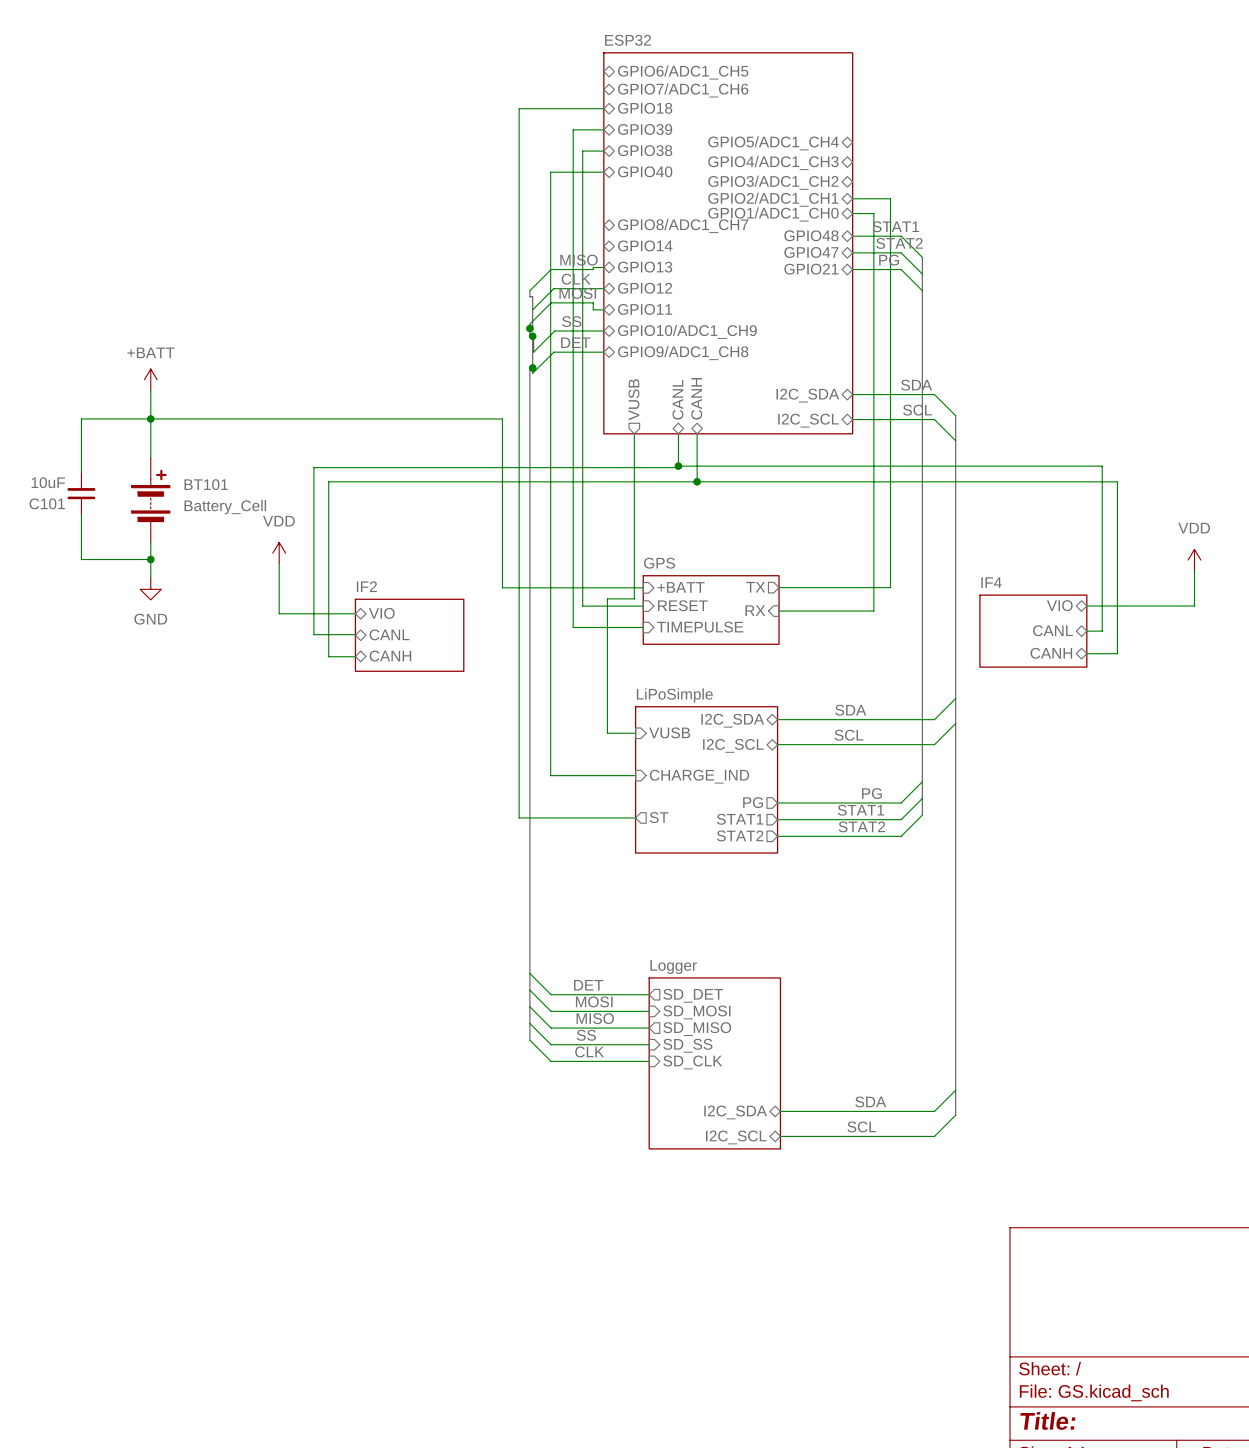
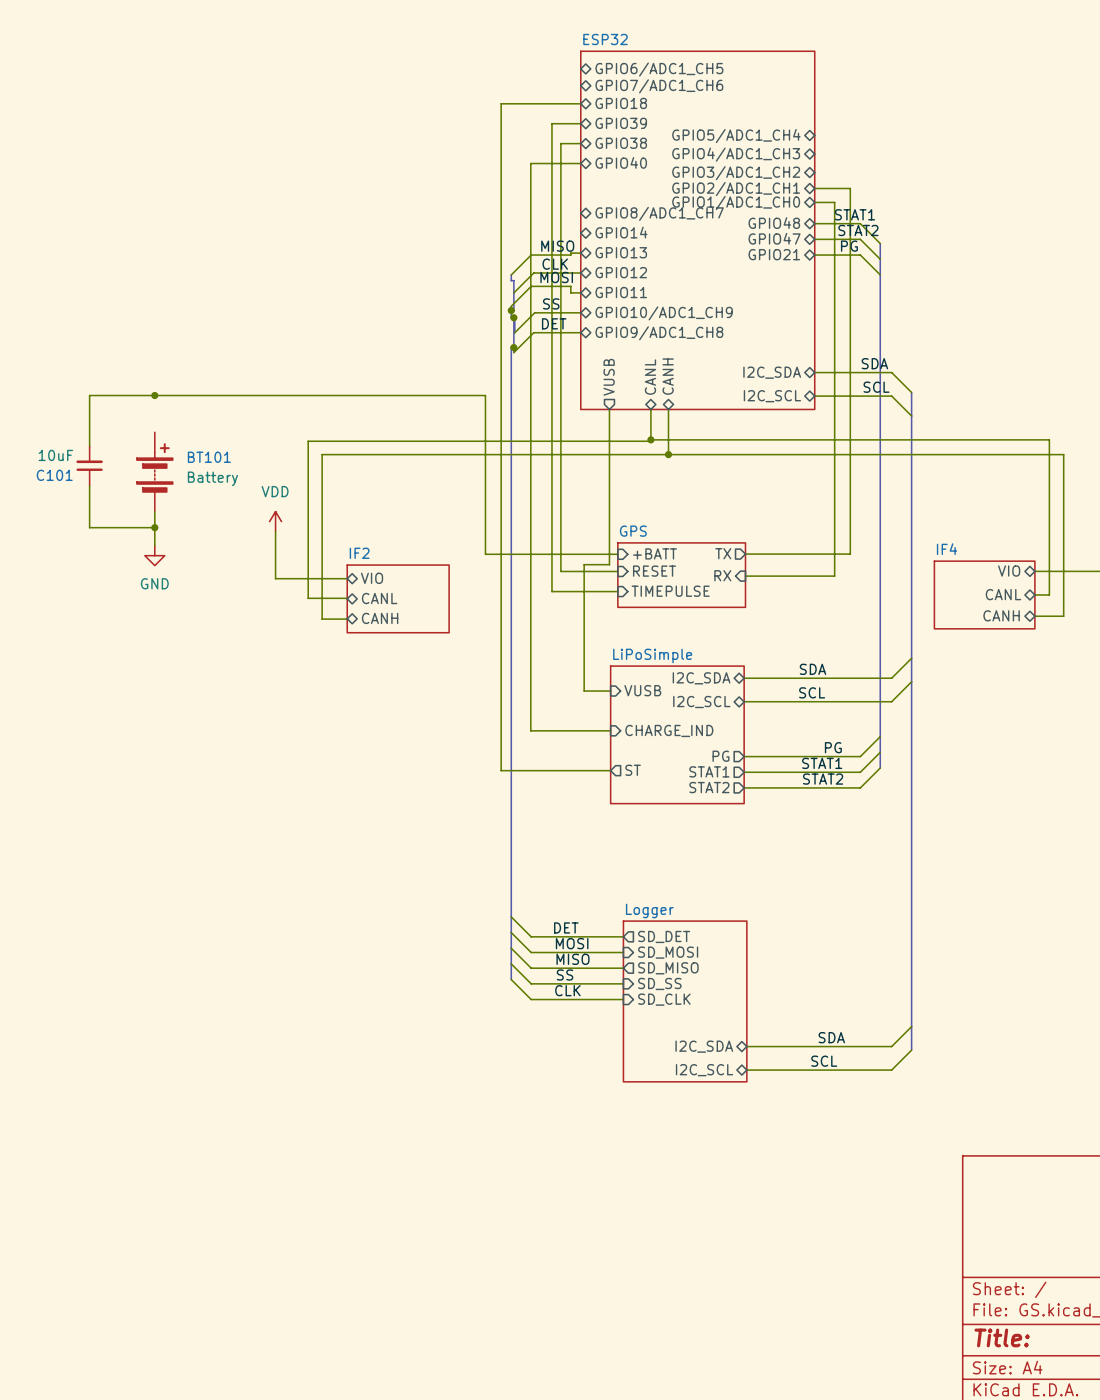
power symbol: +BATT (150, 379) -> none
wire: (150, 390) (150, 458) -> none
BT101 value: Battery_Cell (225, 507) -> Battery (212, 478)

